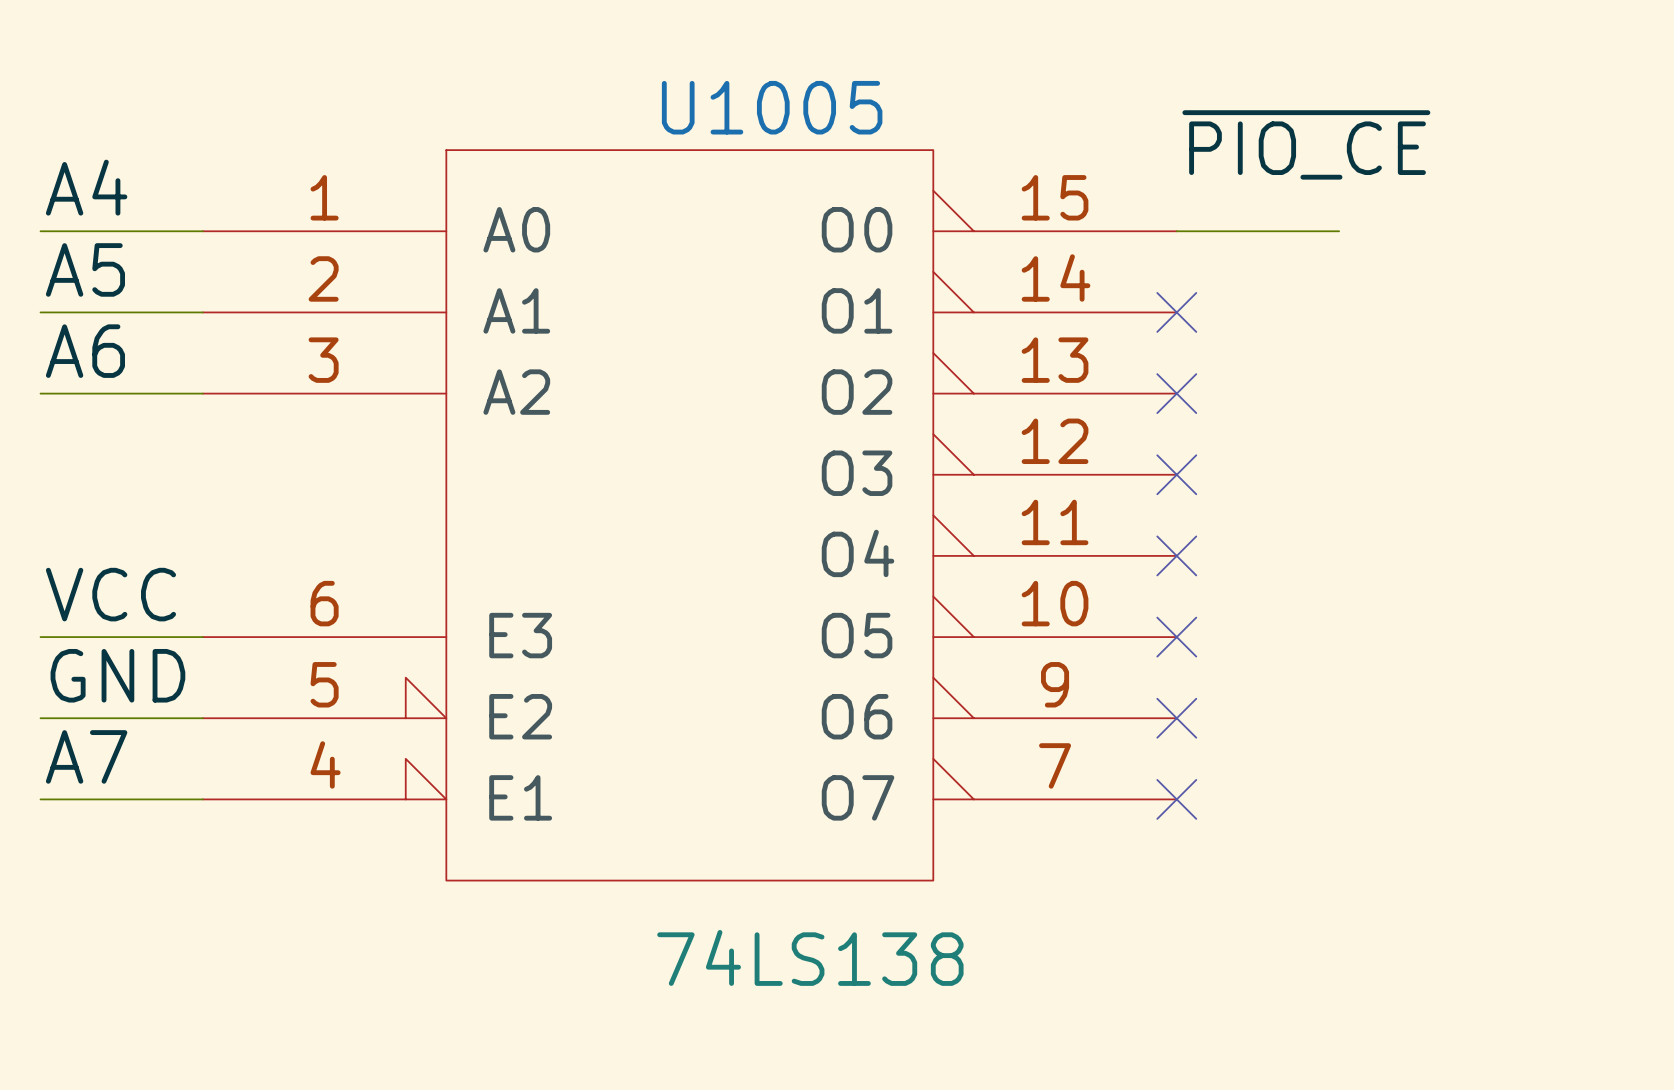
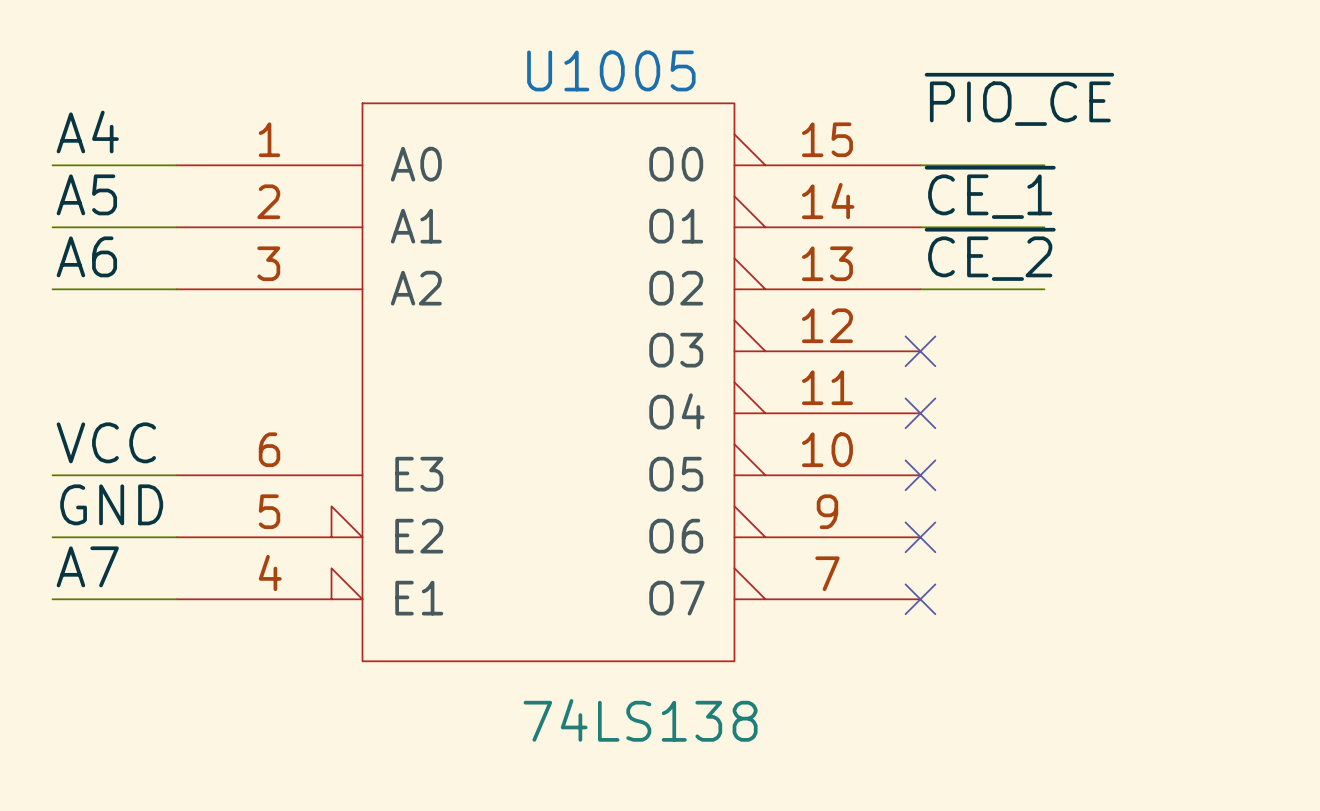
label: none -> ~{CE_1} (990, 192)
wire: none -> (920, 227) (1044, 227)
no-connect mark: (1176, 312) -> none
label: none -> ~{CE_2} (990, 254)
wire: none -> (920, 289) (1044, 289)
no-connect mark: (1176, 393) -> none

